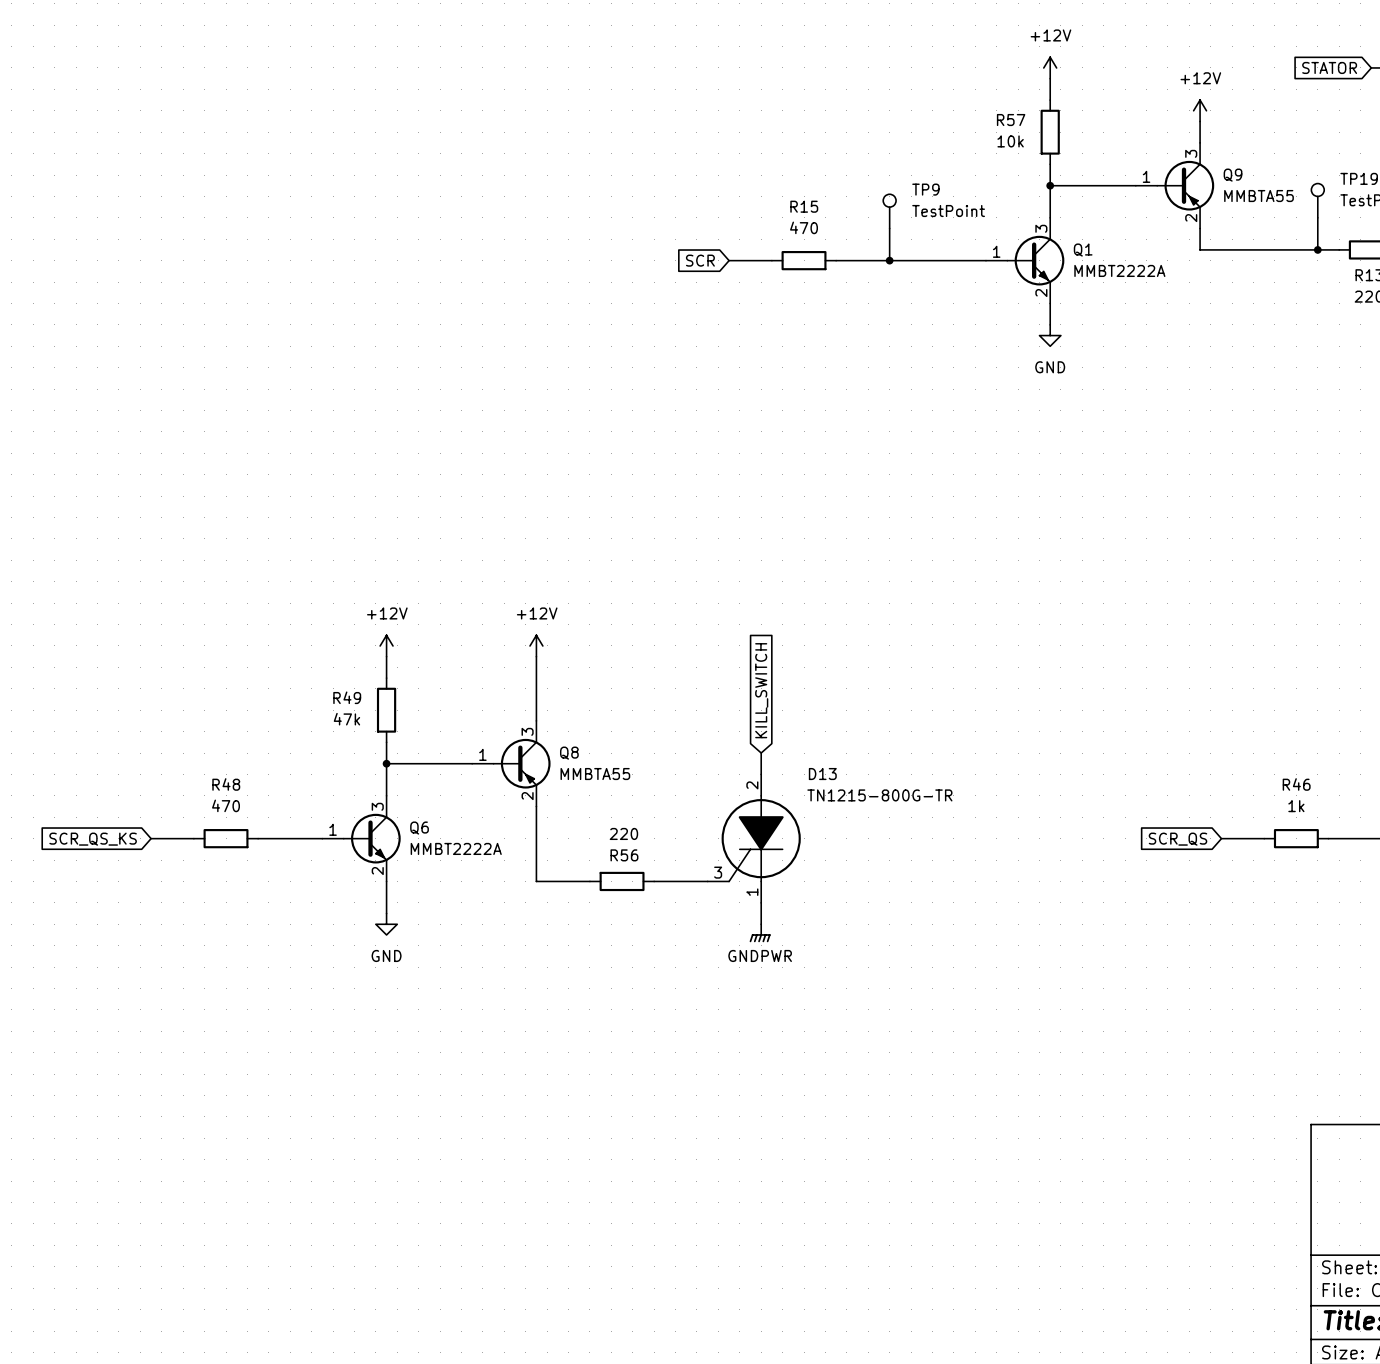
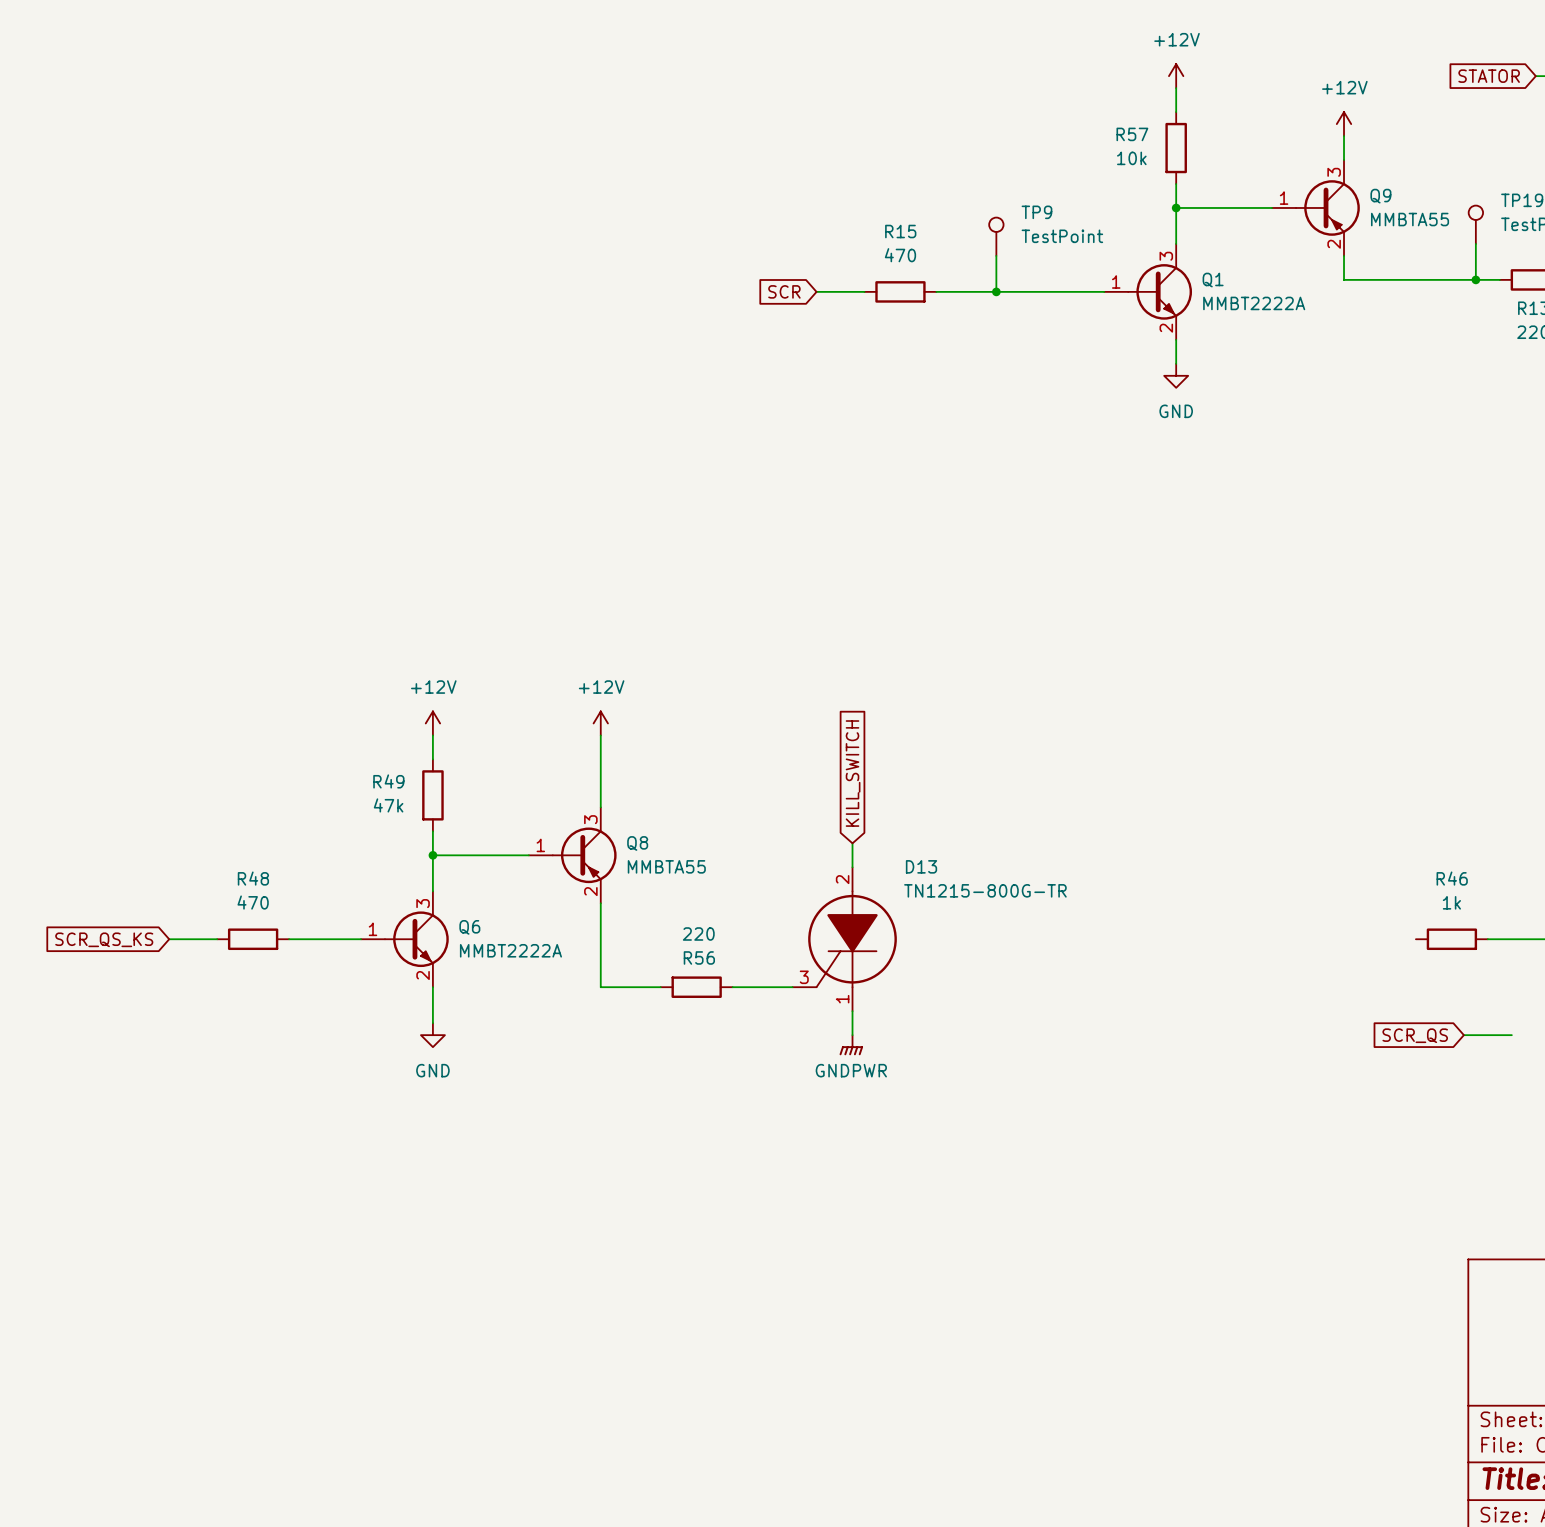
wire: (1221, 838) (1264, 838) -> (1463, 1035) (1511, 1035)
global label position: SCR_QS (1177, 839) -> SCR_QS (1415, 1035)

